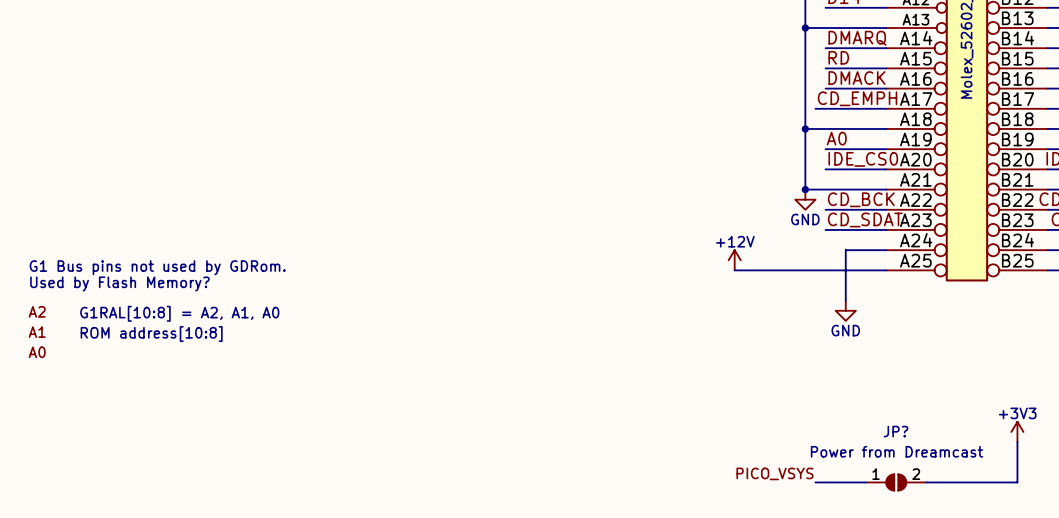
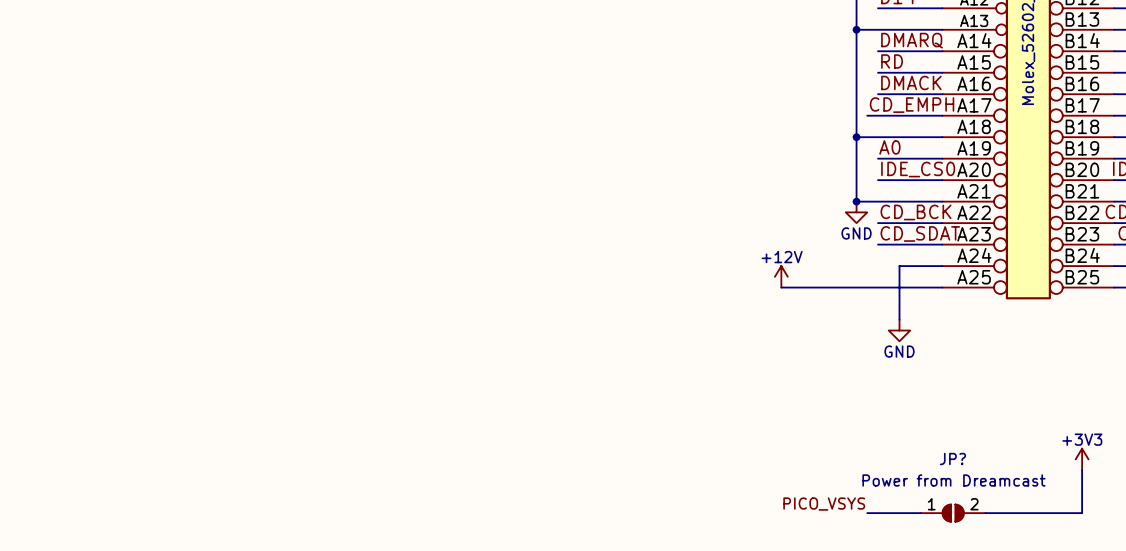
text: G1 Bus pins not used by GDRom. (157, 267) -> none
text: Used by Flash Memory? (119, 283) -> none
label: A2 (37, 311) -> none
text: G1RAL[10:8] = A2, A1, A0 (179, 313) -> none
label: A1 (37, 332) -> none
text: ROM address[10:8] (151, 334) -> none
label: A0 (37, 352) -> none

